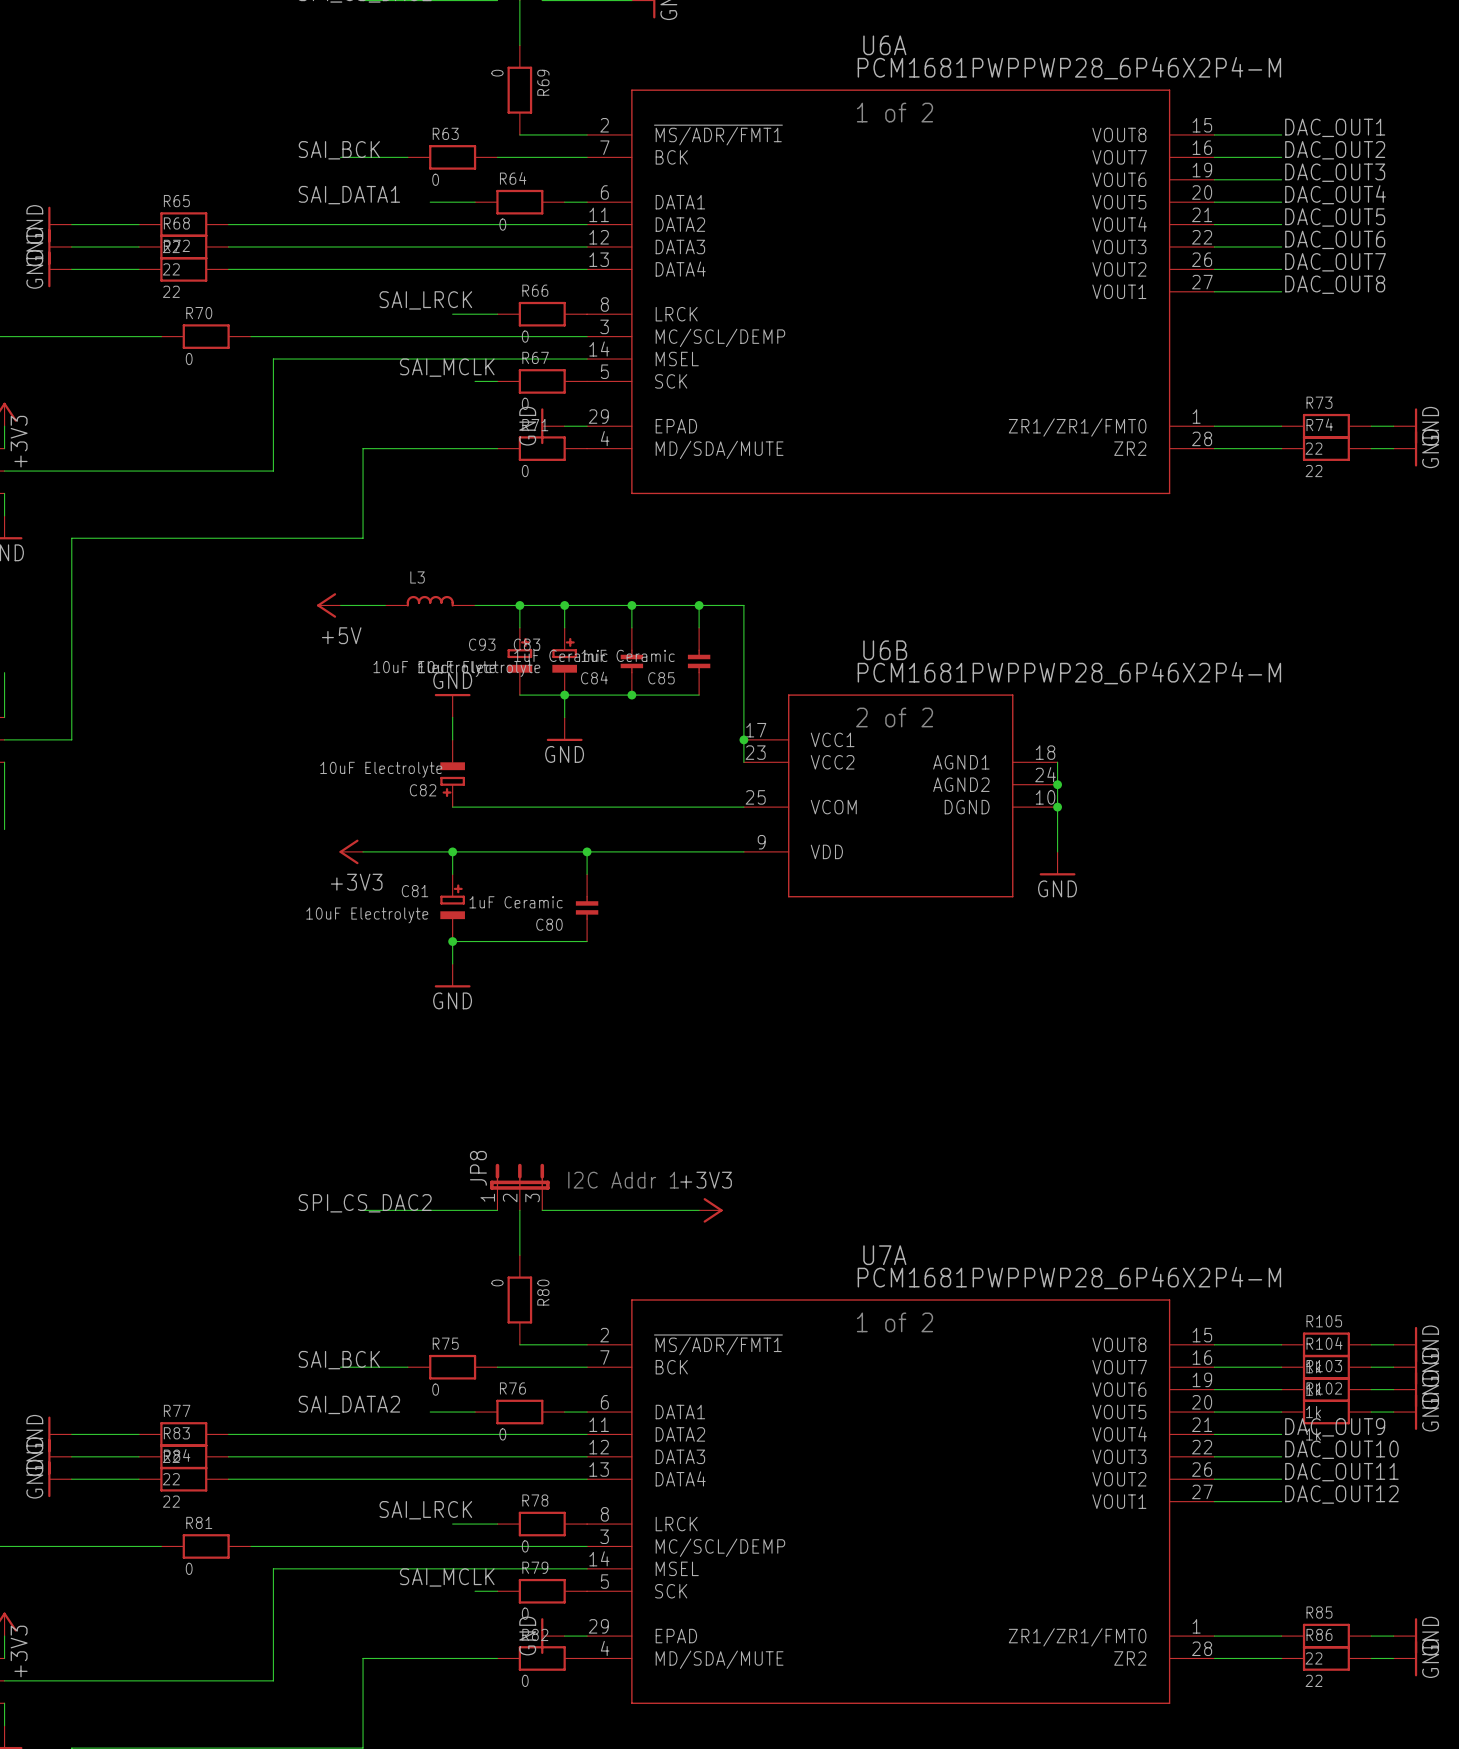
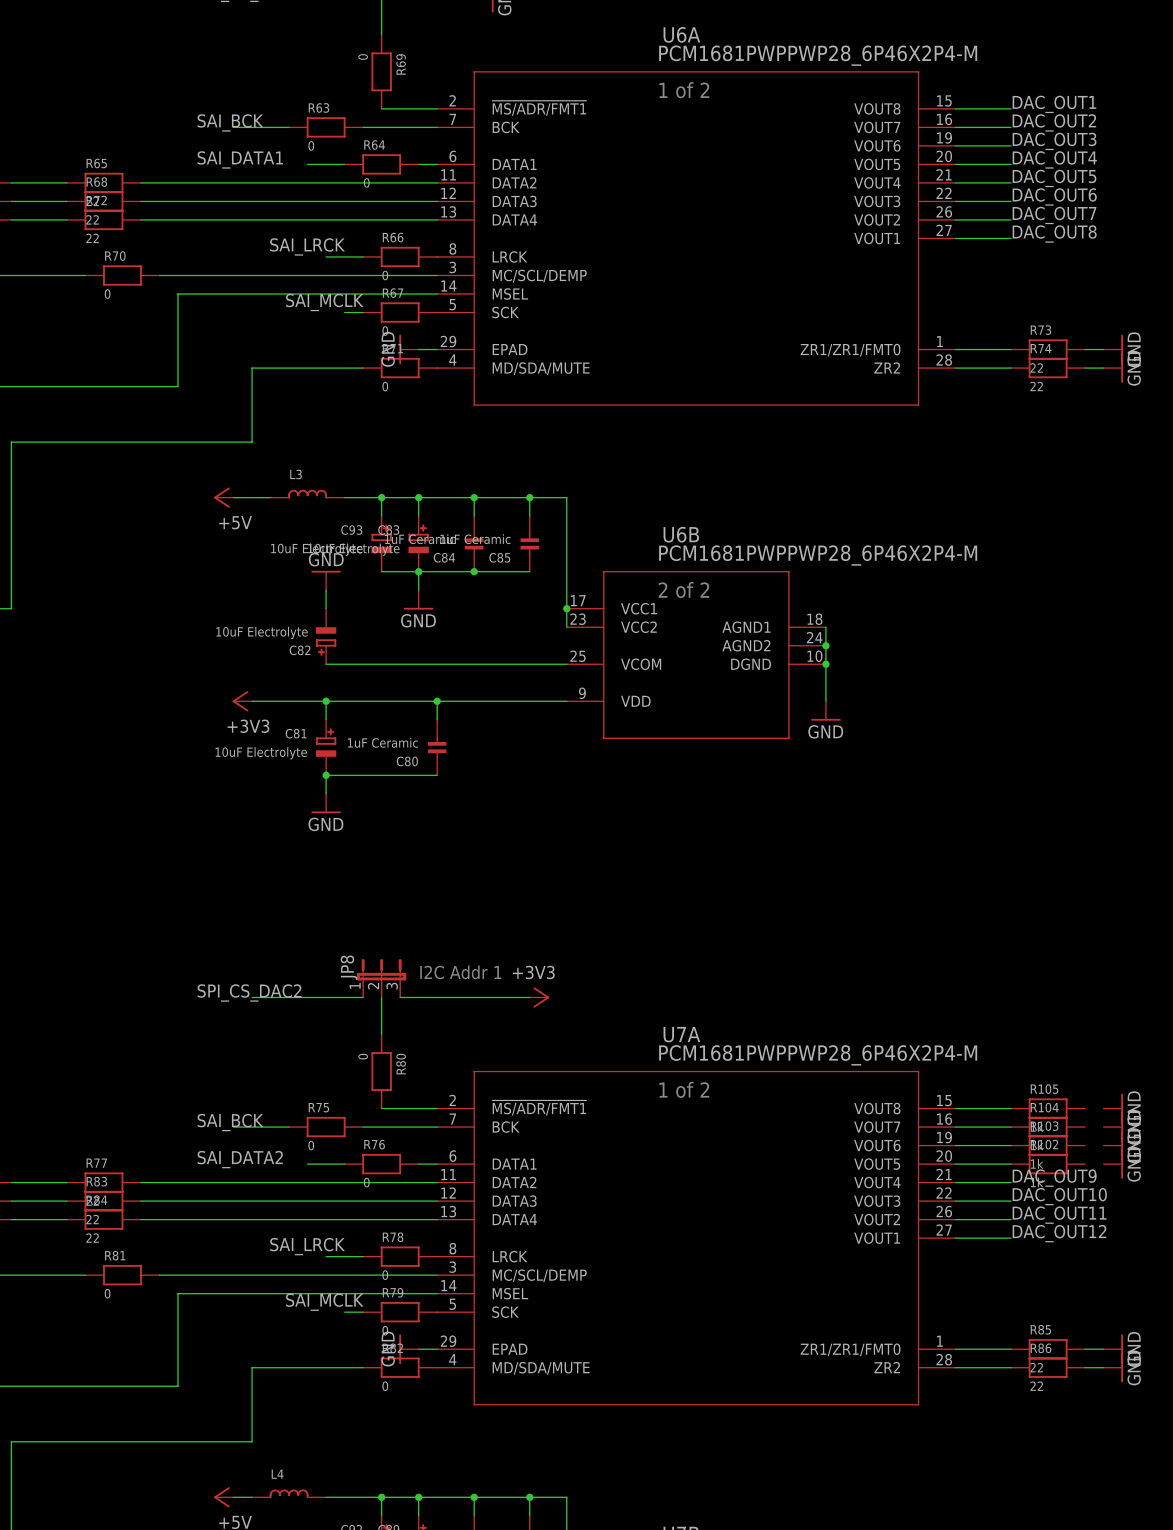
wire: (1371, 1344) (1393, 1344) -> none
wire: (1371, 1367) (1393, 1367) -> none
wire: (1371, 1389) (1393, 1389) -> none
wire: (1371, 1412) (1393, 1412) -> none

